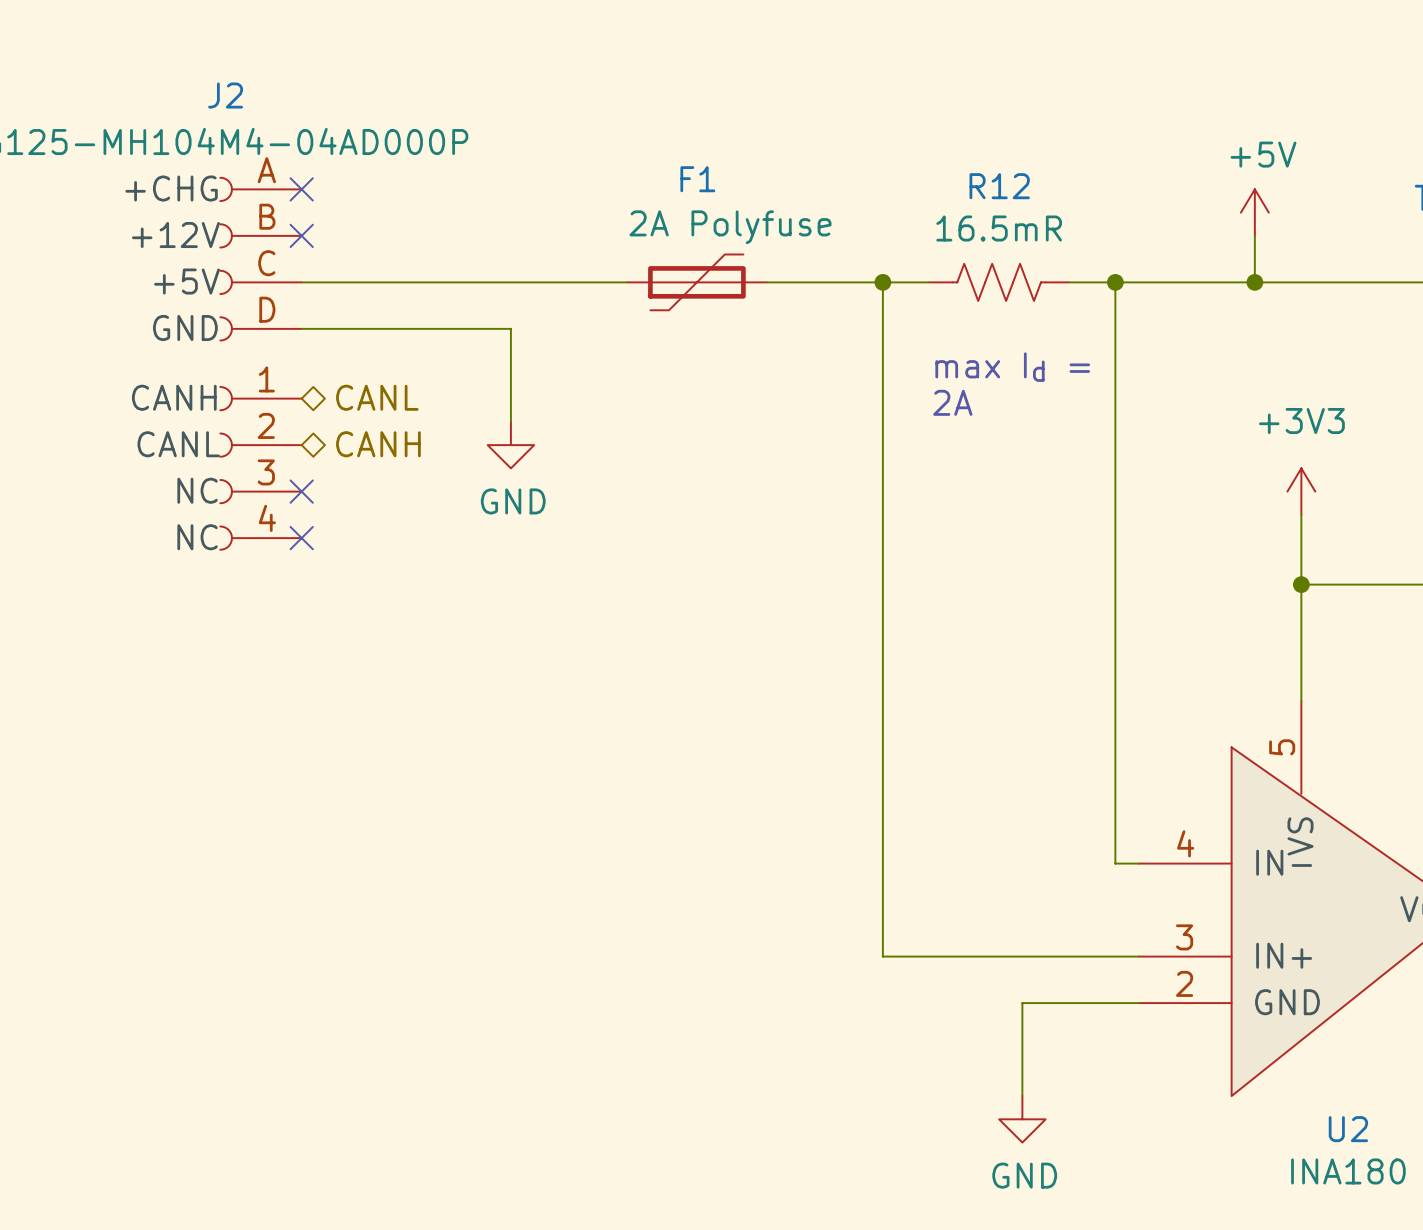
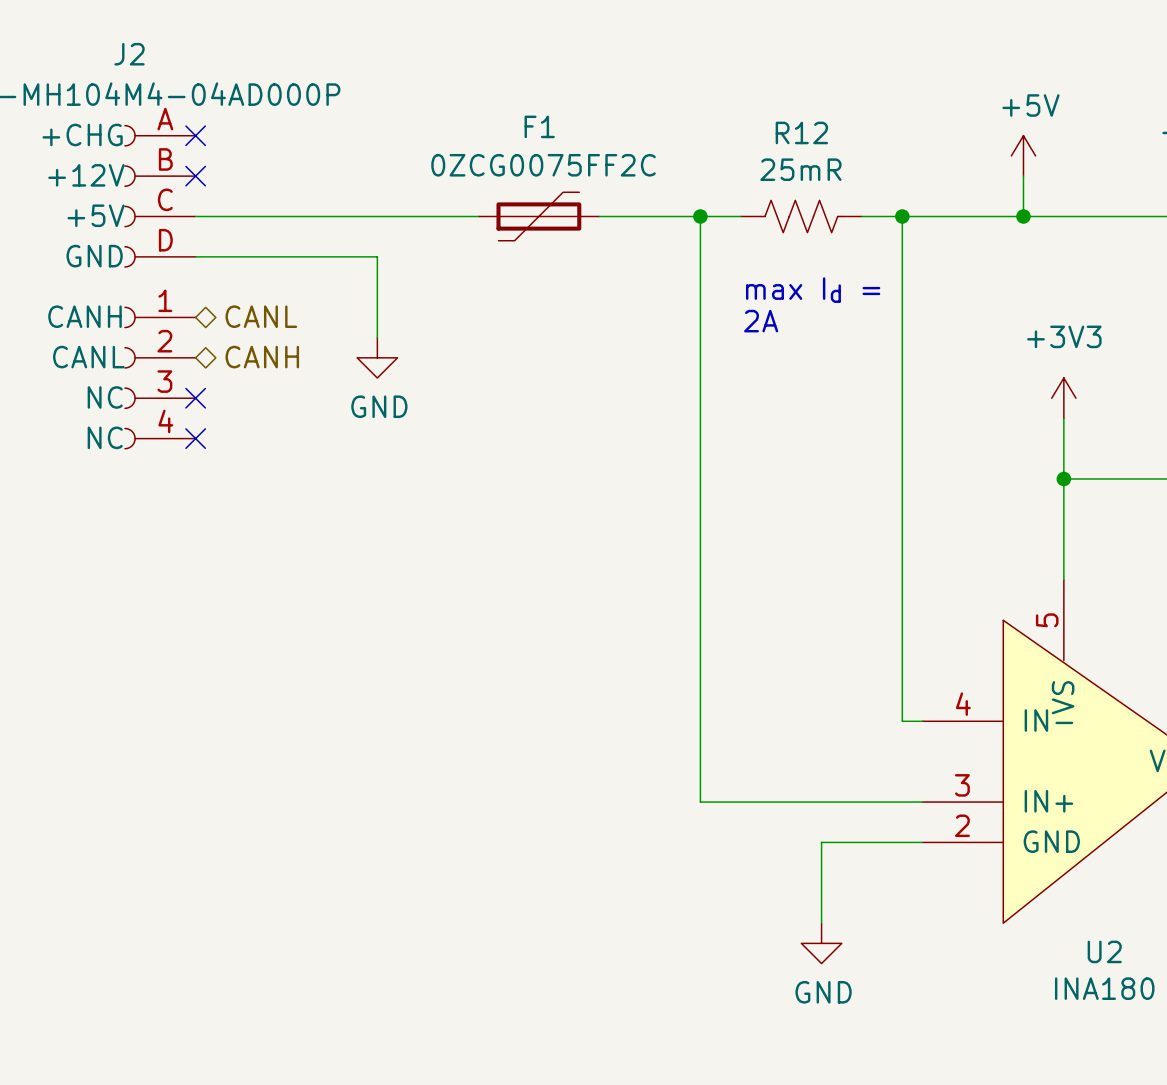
F1 value: 2A Polyfuse (730, 227) -> 0ZCG0075FF2C (543, 165)
R12 value: 16.5mR (999, 228) -> 25mR (800, 169)

